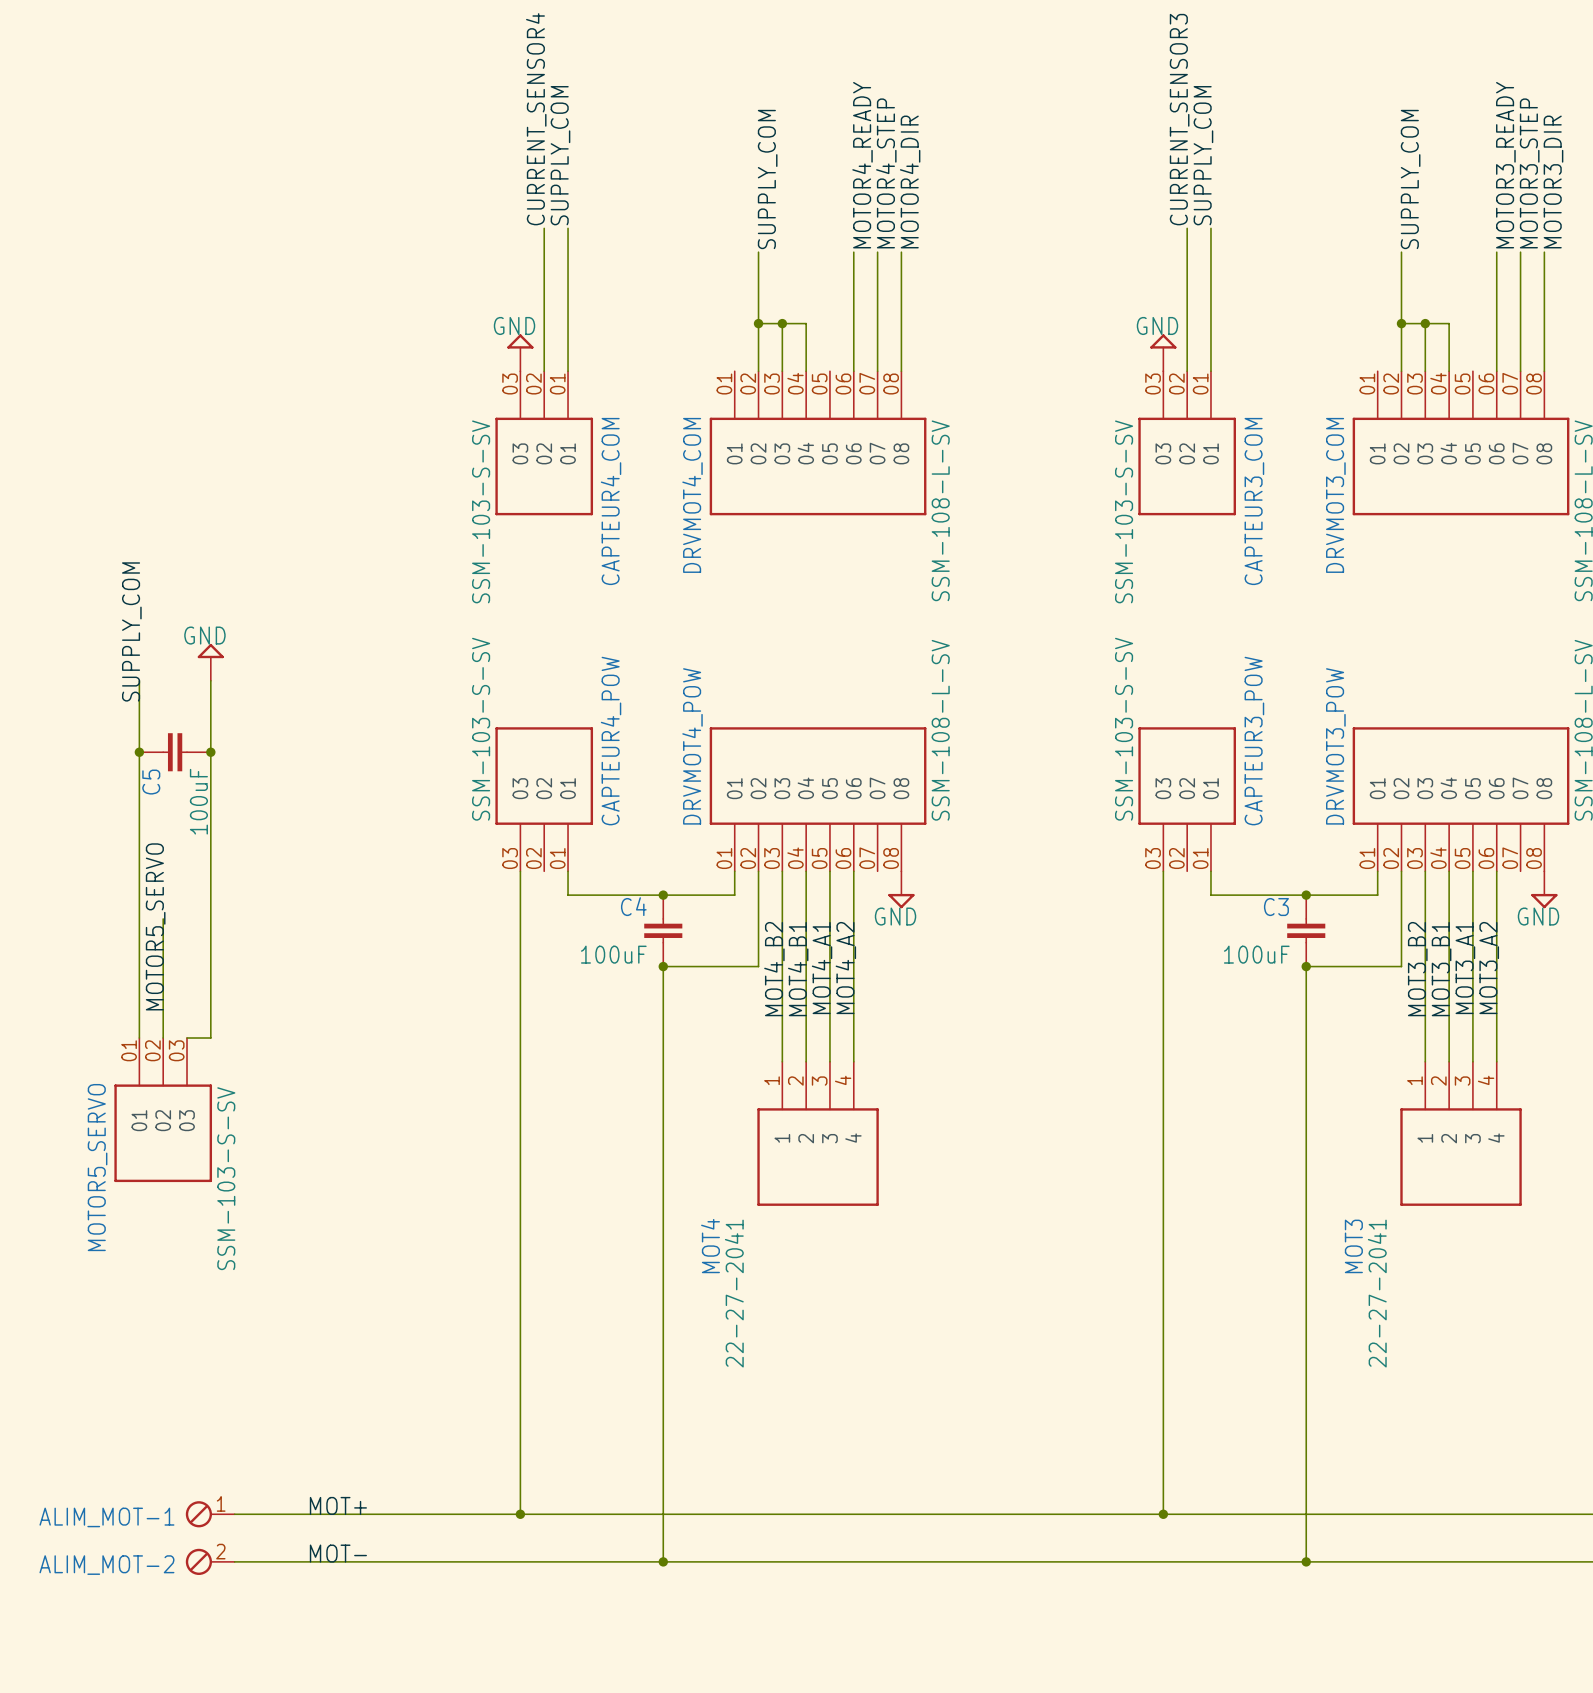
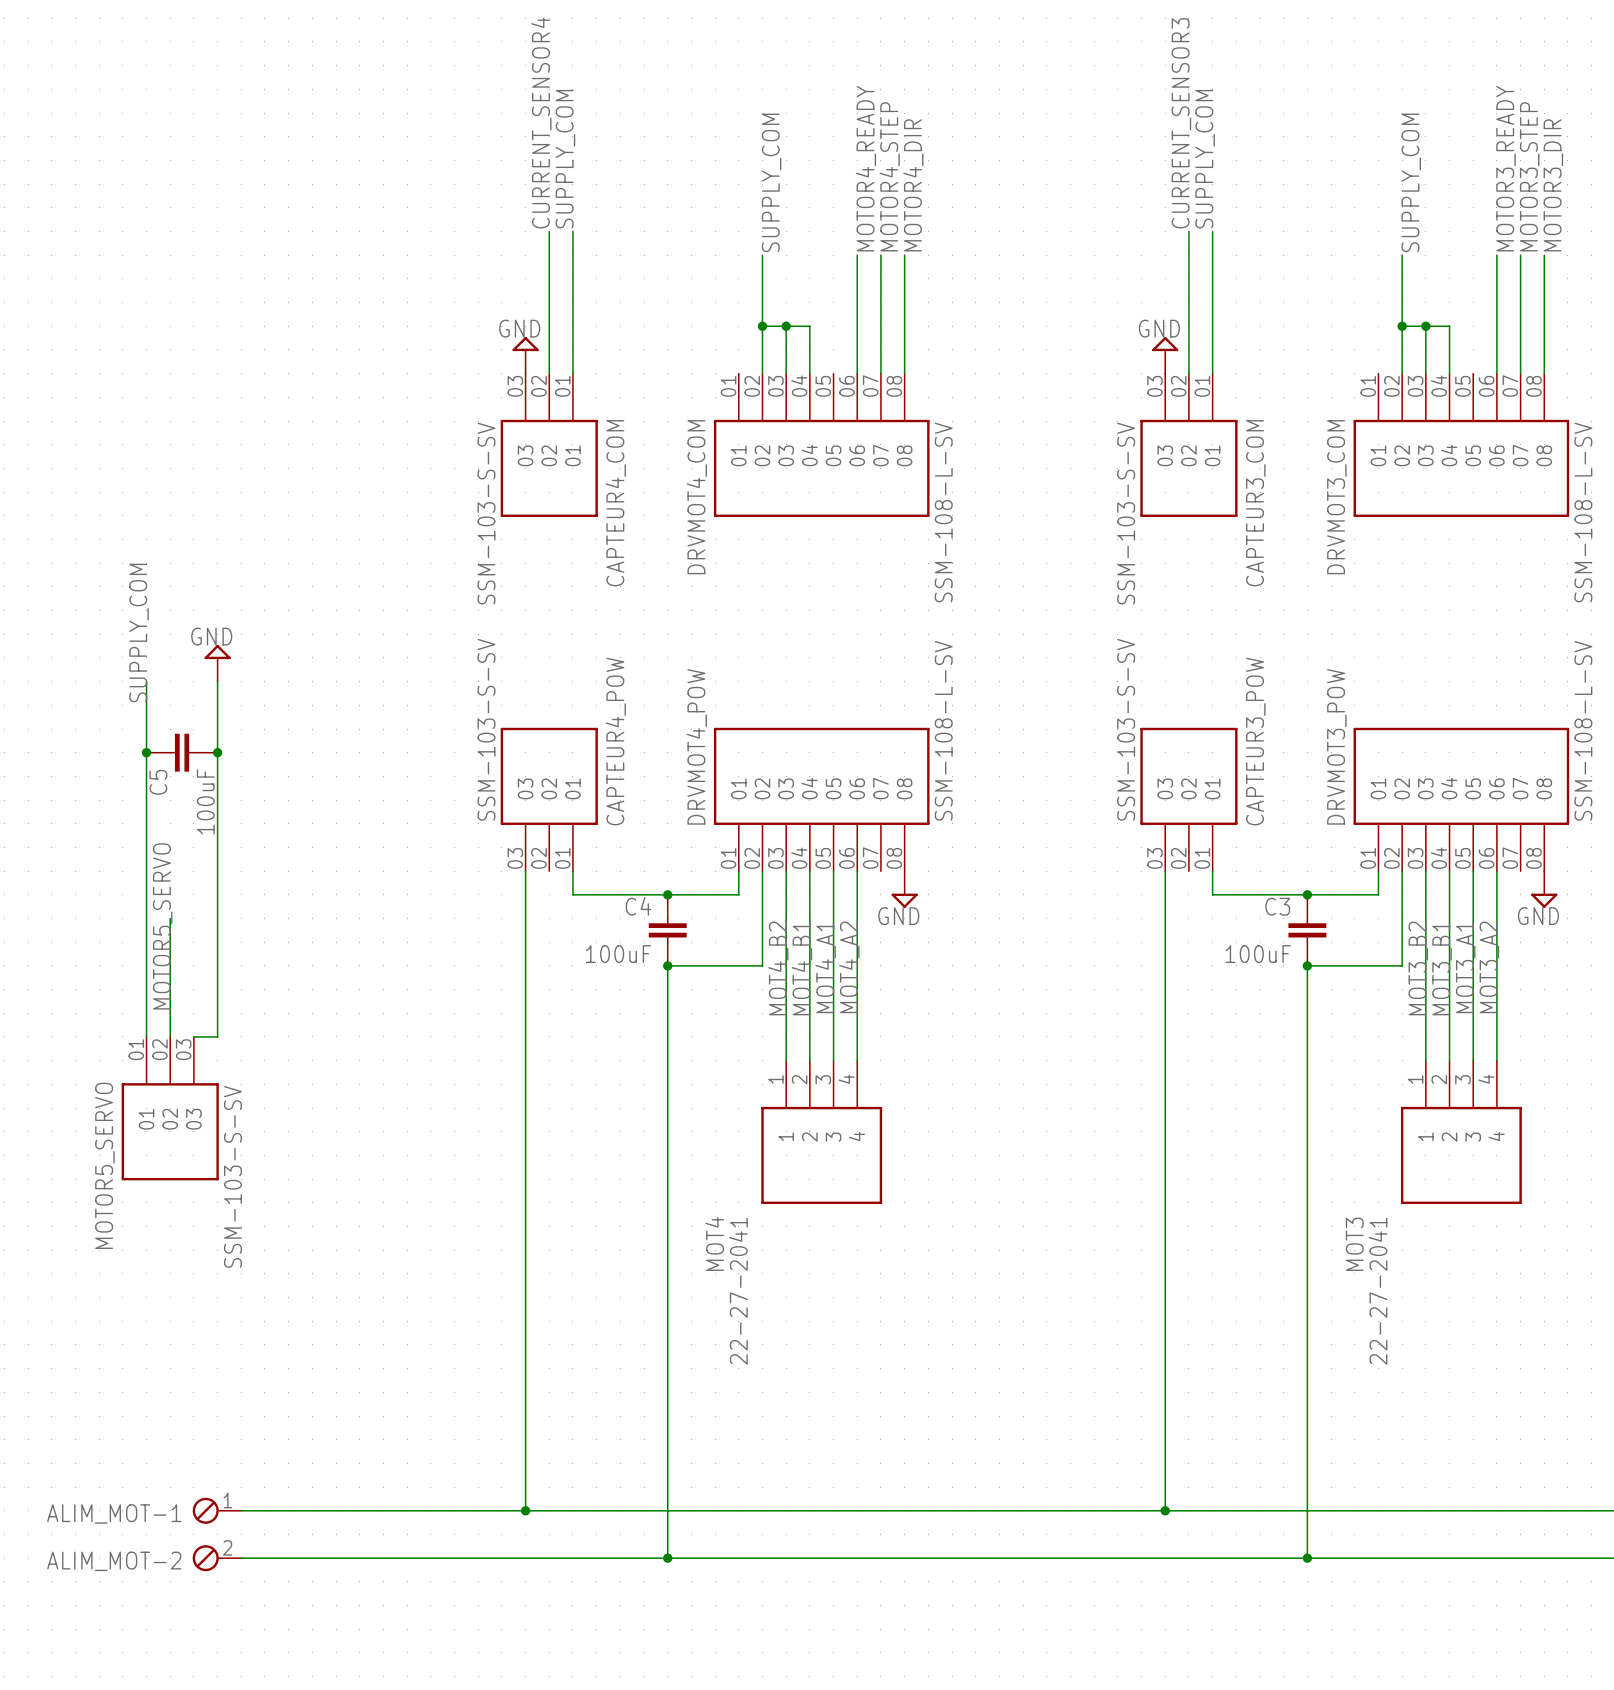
label: MOT+ (338, 1505) -> none
label: MOT- (338, 1553) -> none

